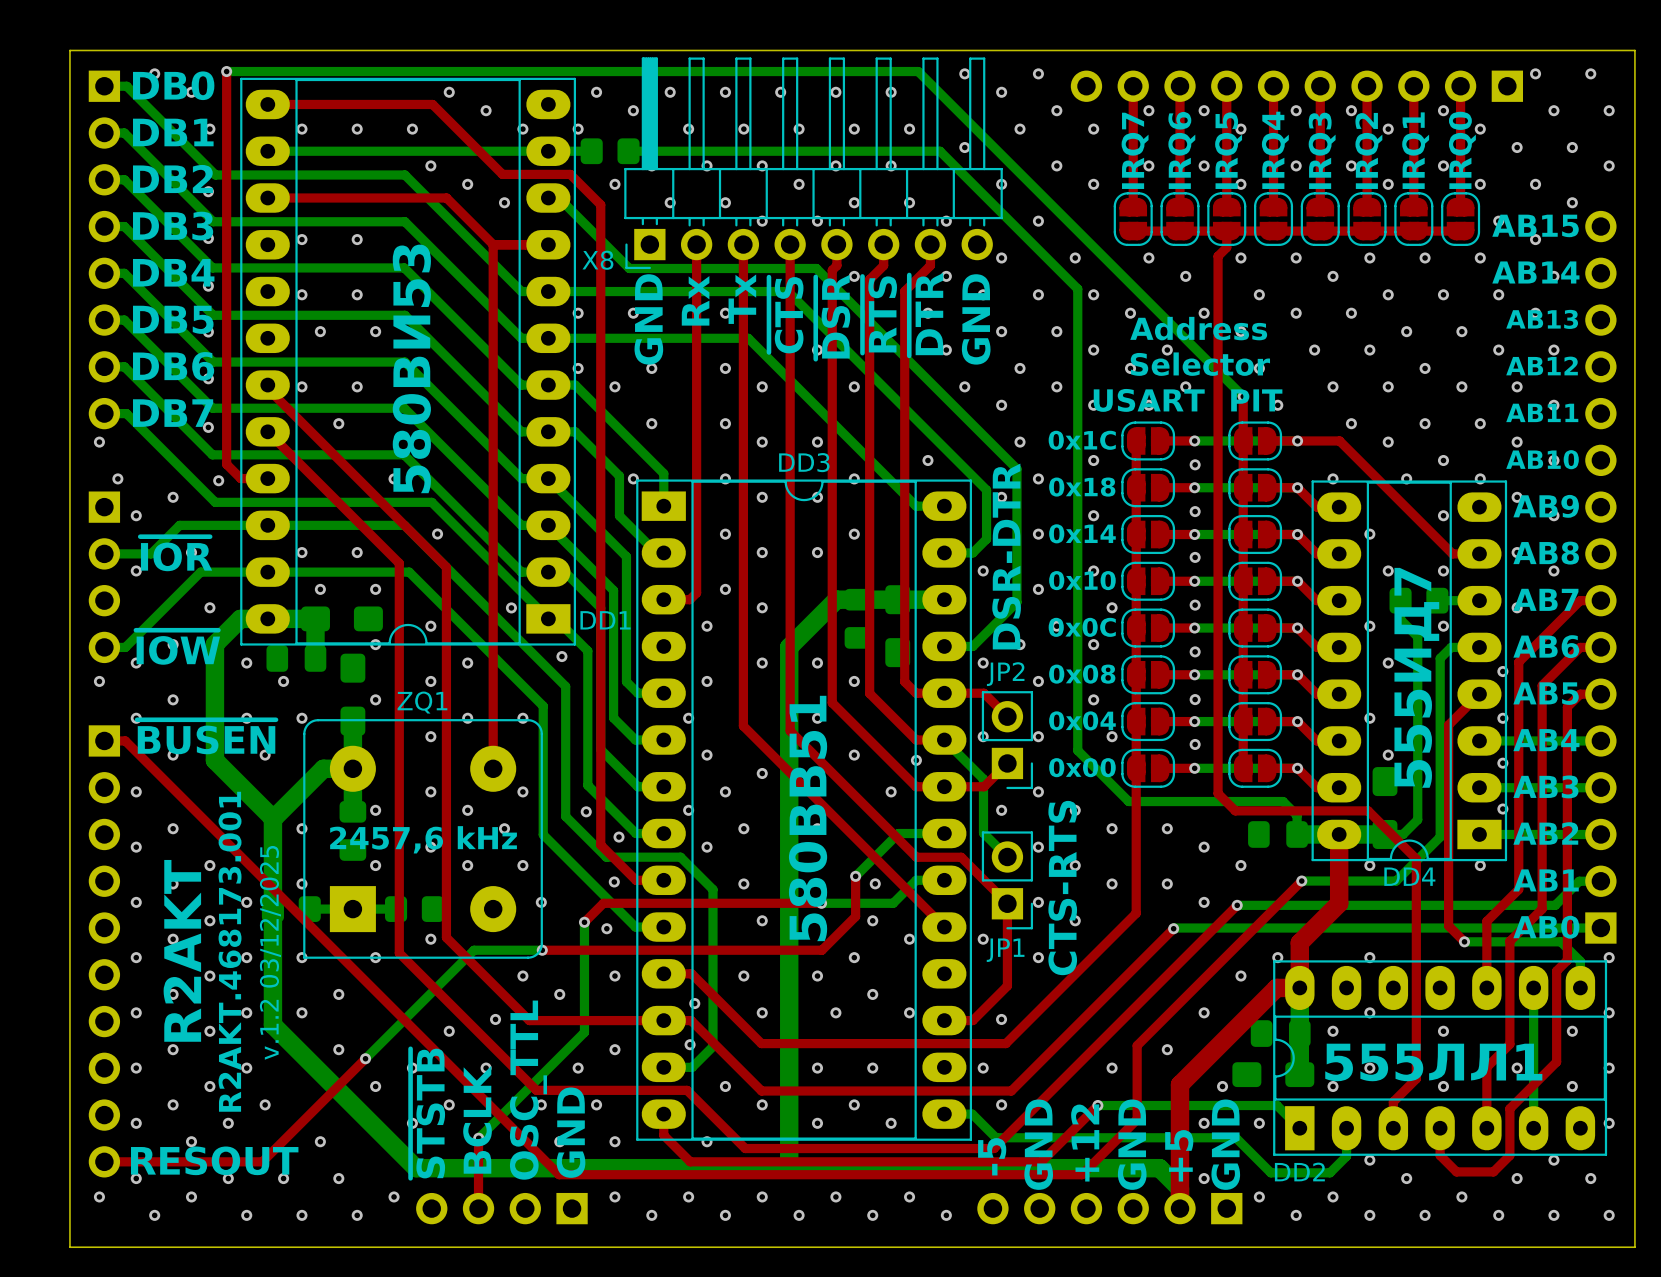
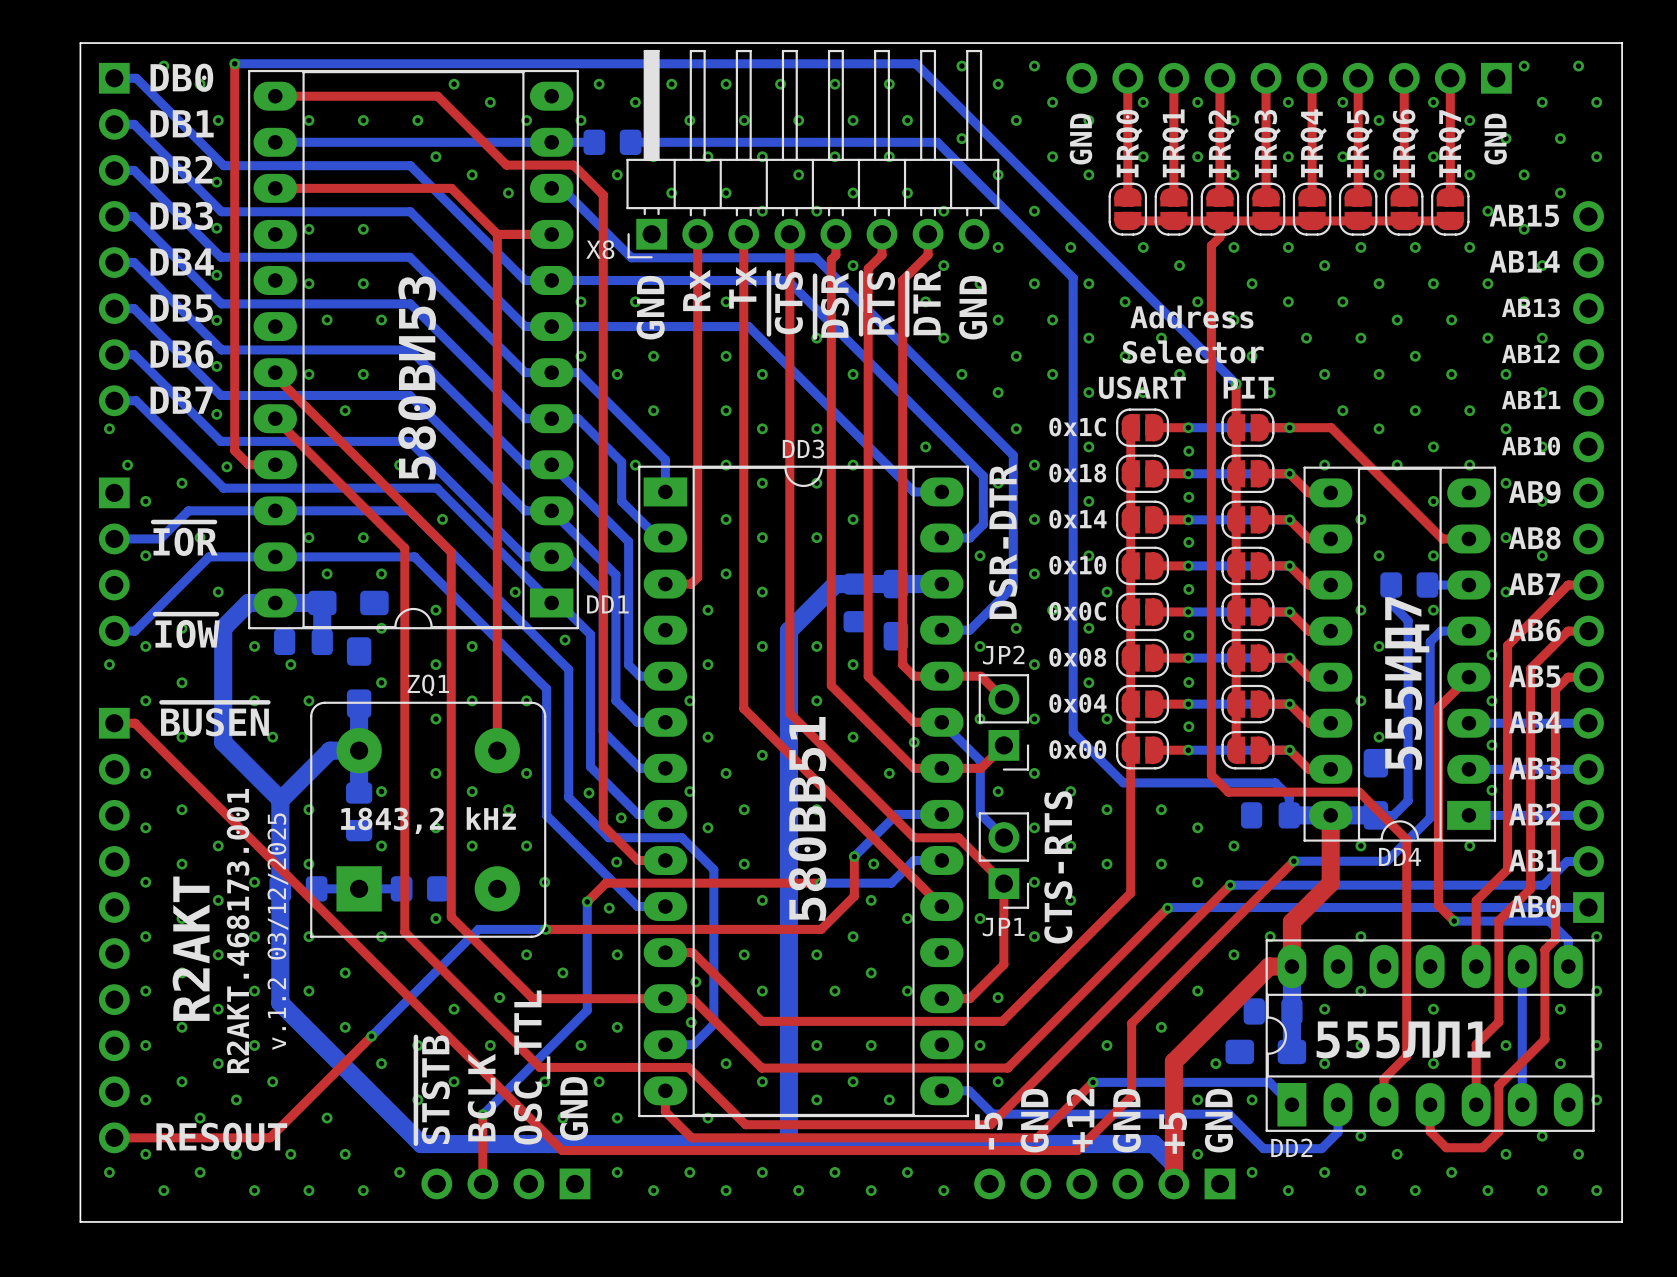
text: none -> GND (1080, 139)
text: none -> GND (1495, 139)
text: IRQ7 (1135, 150) -> IRQ0 (1129, 143)
text: IRQ6 (1181, 150) -> IRQ1 (1175, 143)
text: IRQ5 (1228, 150) -> IRQ2 (1221, 143)
text: IRQ4 (1275, 150) -> IRQ3 (1267, 143)
text: IRQ3 (1322, 150) -> IRQ4 (1313, 143)
text: IRQ2 (1368, 150) -> IRQ5 (1359, 143)
text: IRQ1 (1415, 150) -> IRQ6 (1405, 143)
text: IRQ0 (1462, 150) -> IRQ7 (1451, 143)
text: 2457,6 kHz (423, 839) -> 1843,2 kHz (428, 820)

